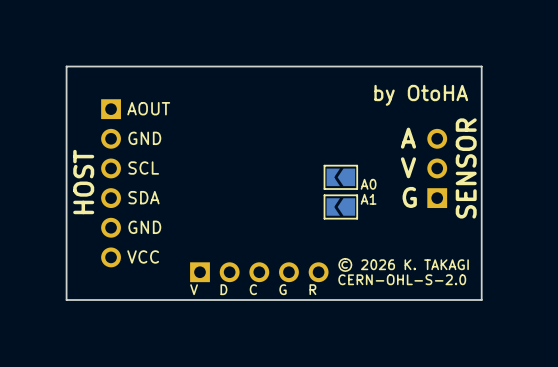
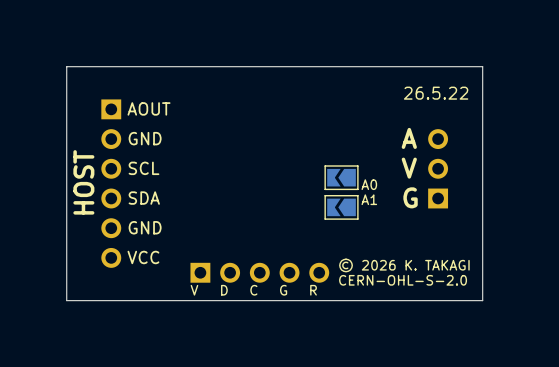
text: by OtoHA (421, 95) -> 26.5.22 (436, 93)
text: SENSOR (466, 168) -> none

